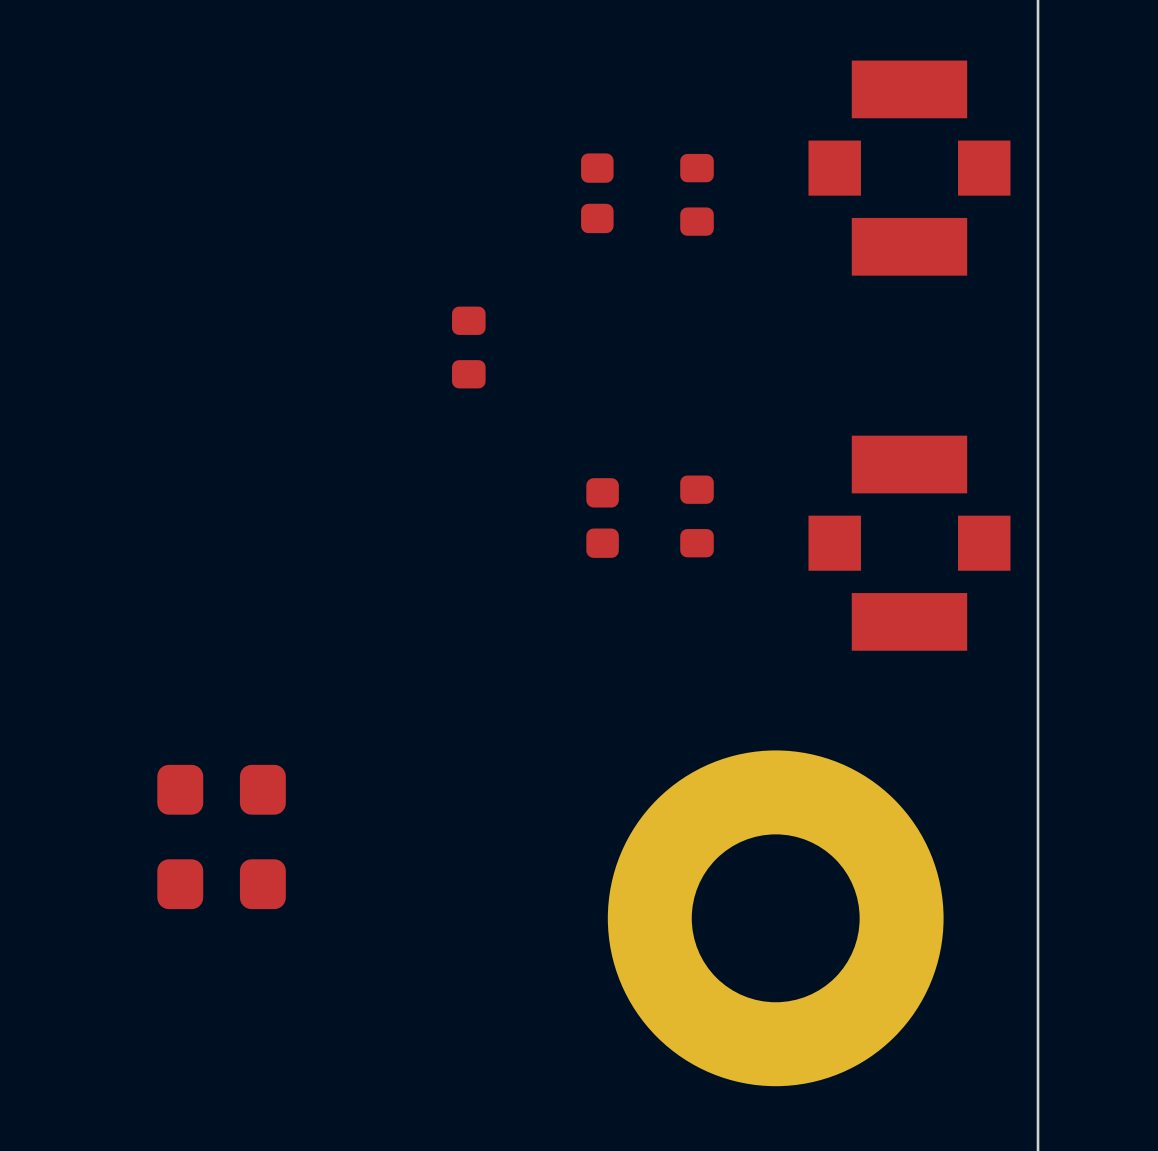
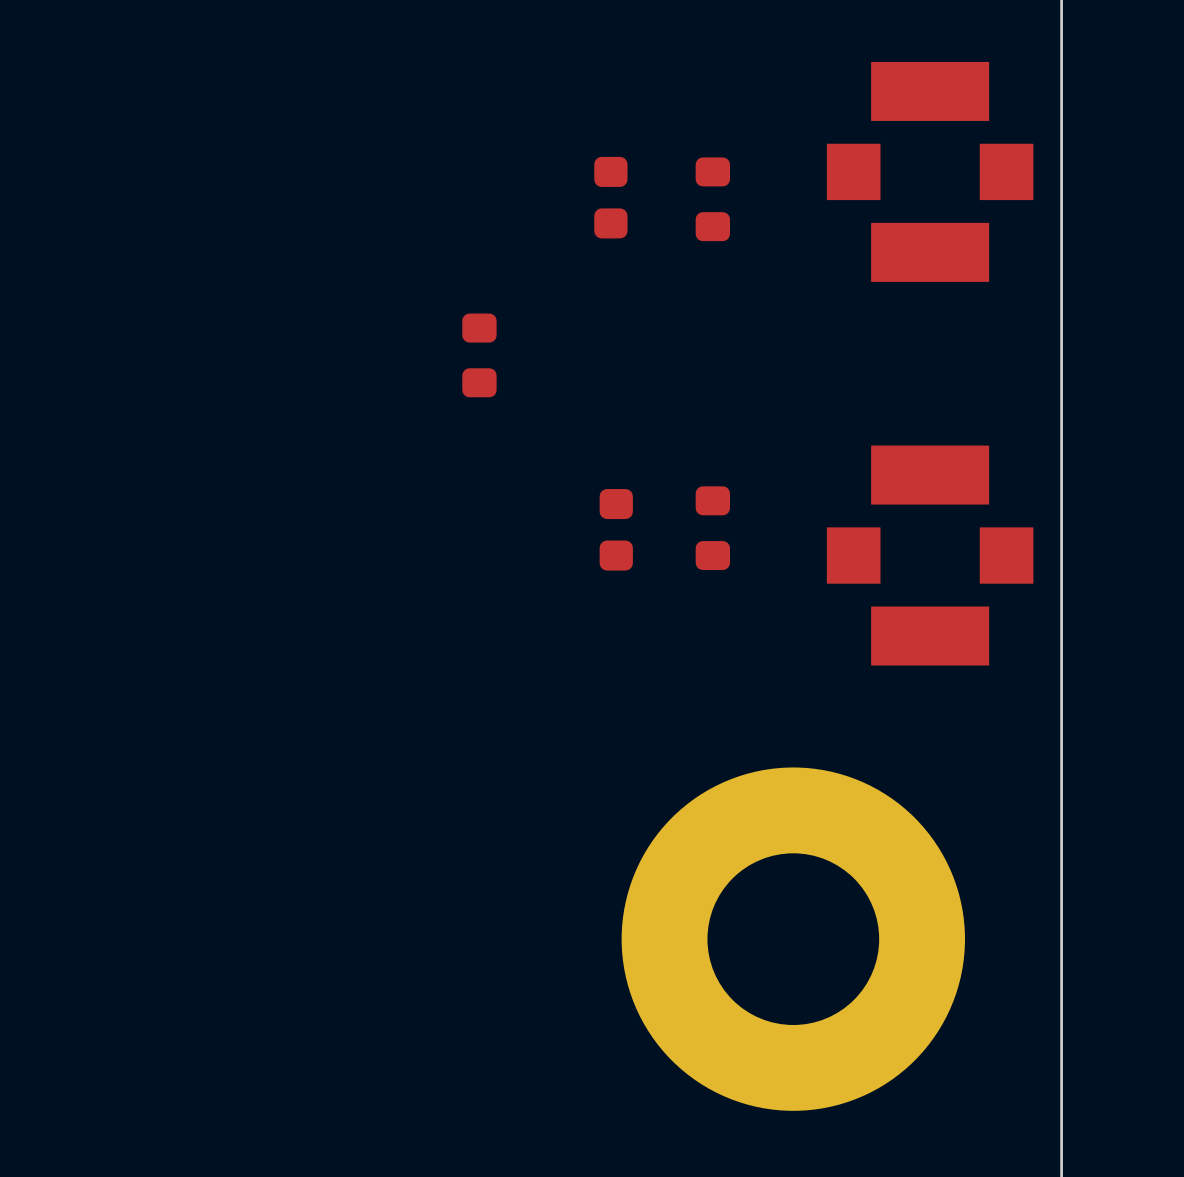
part: (221, 789) -> none
part: (221, 884) -> none

